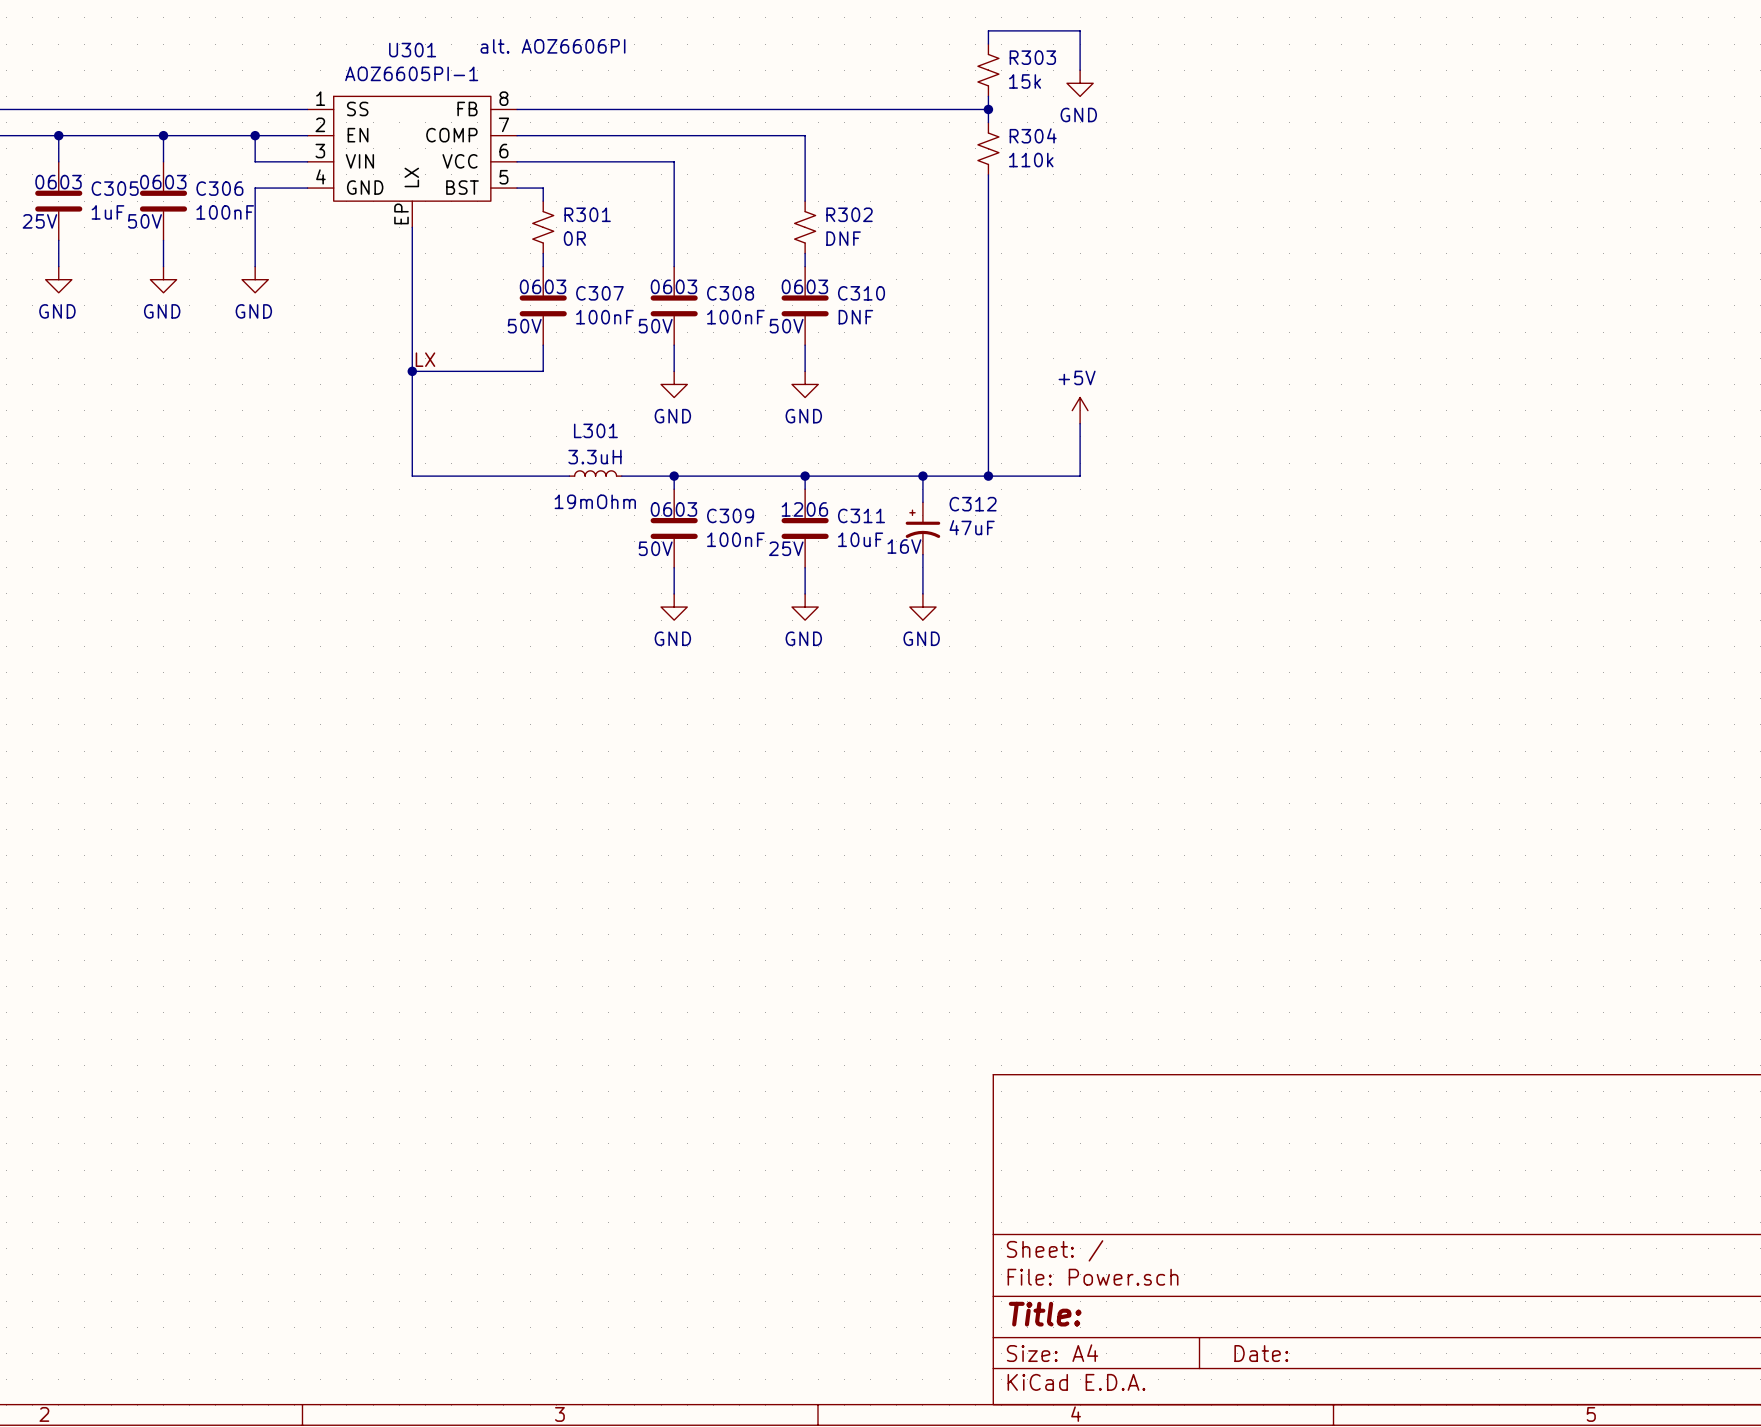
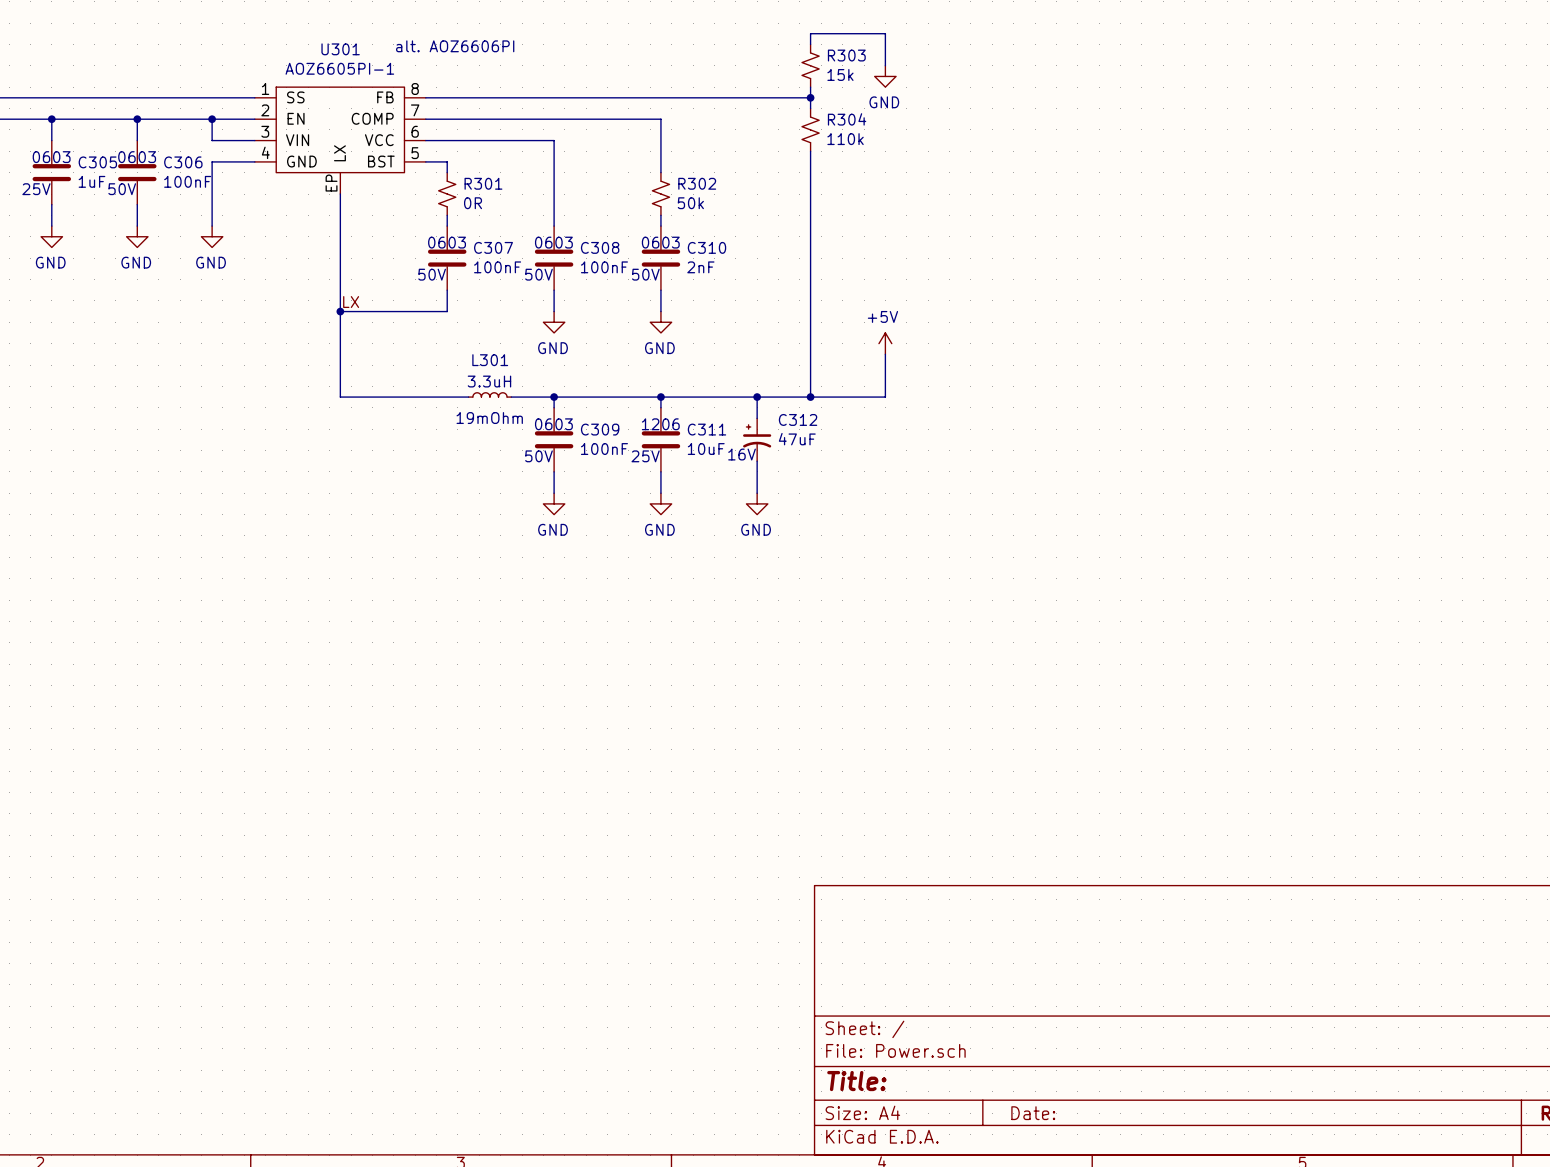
R302 value: DNF (843, 238) -> 50k (690, 203)
C310 value: DNF (855, 317) -> 2nF (700, 267)

